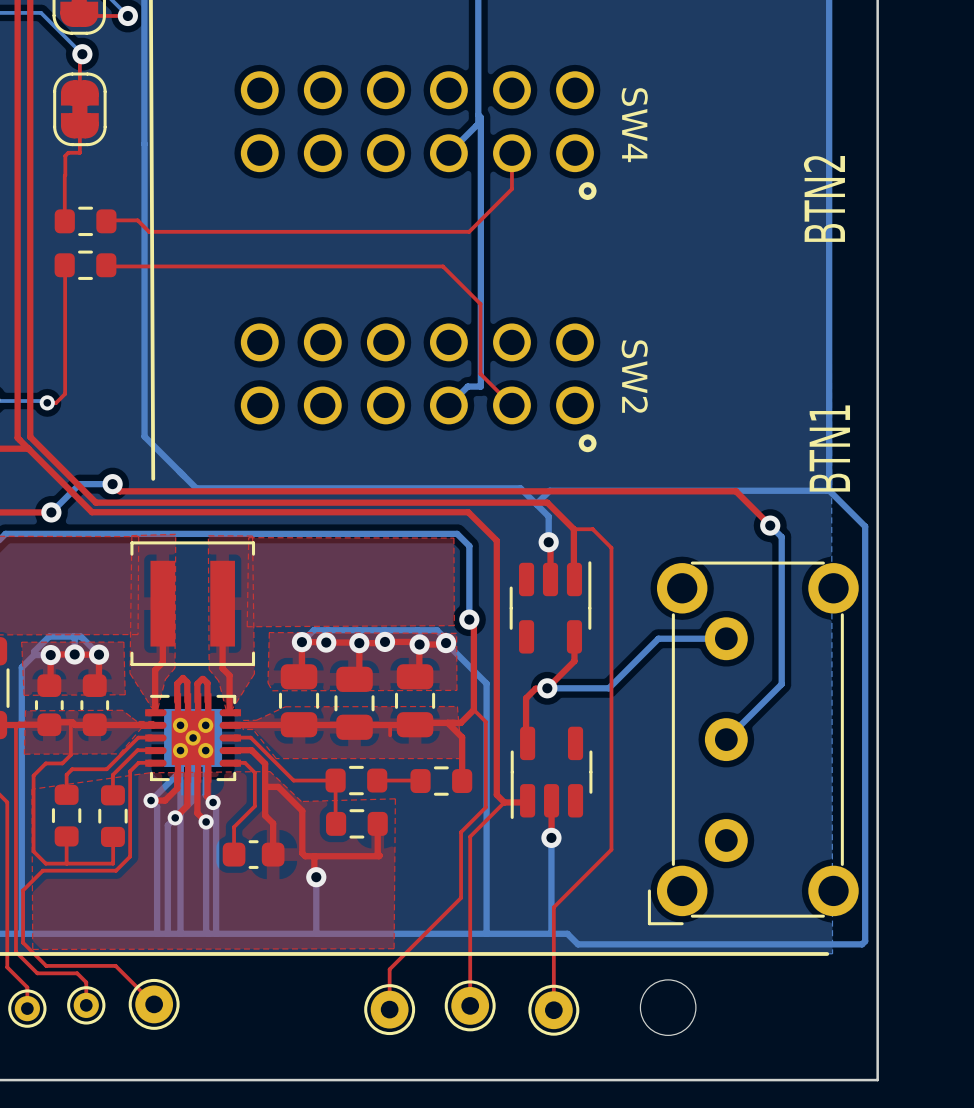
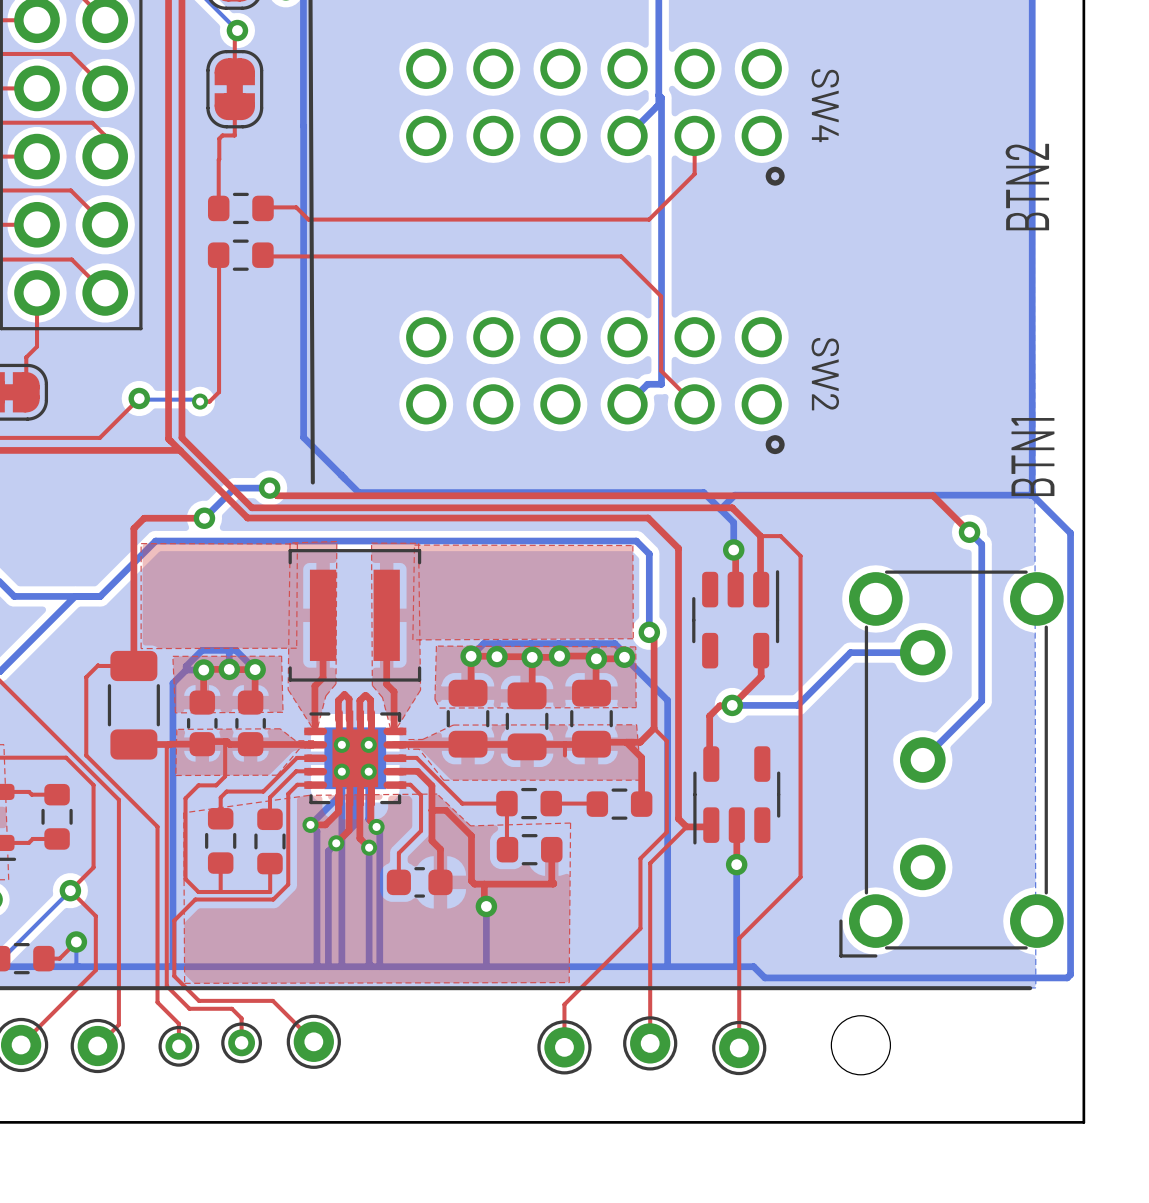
part footprint: [145, 693, 242, 783] -> [304, 710, 407, 806]

